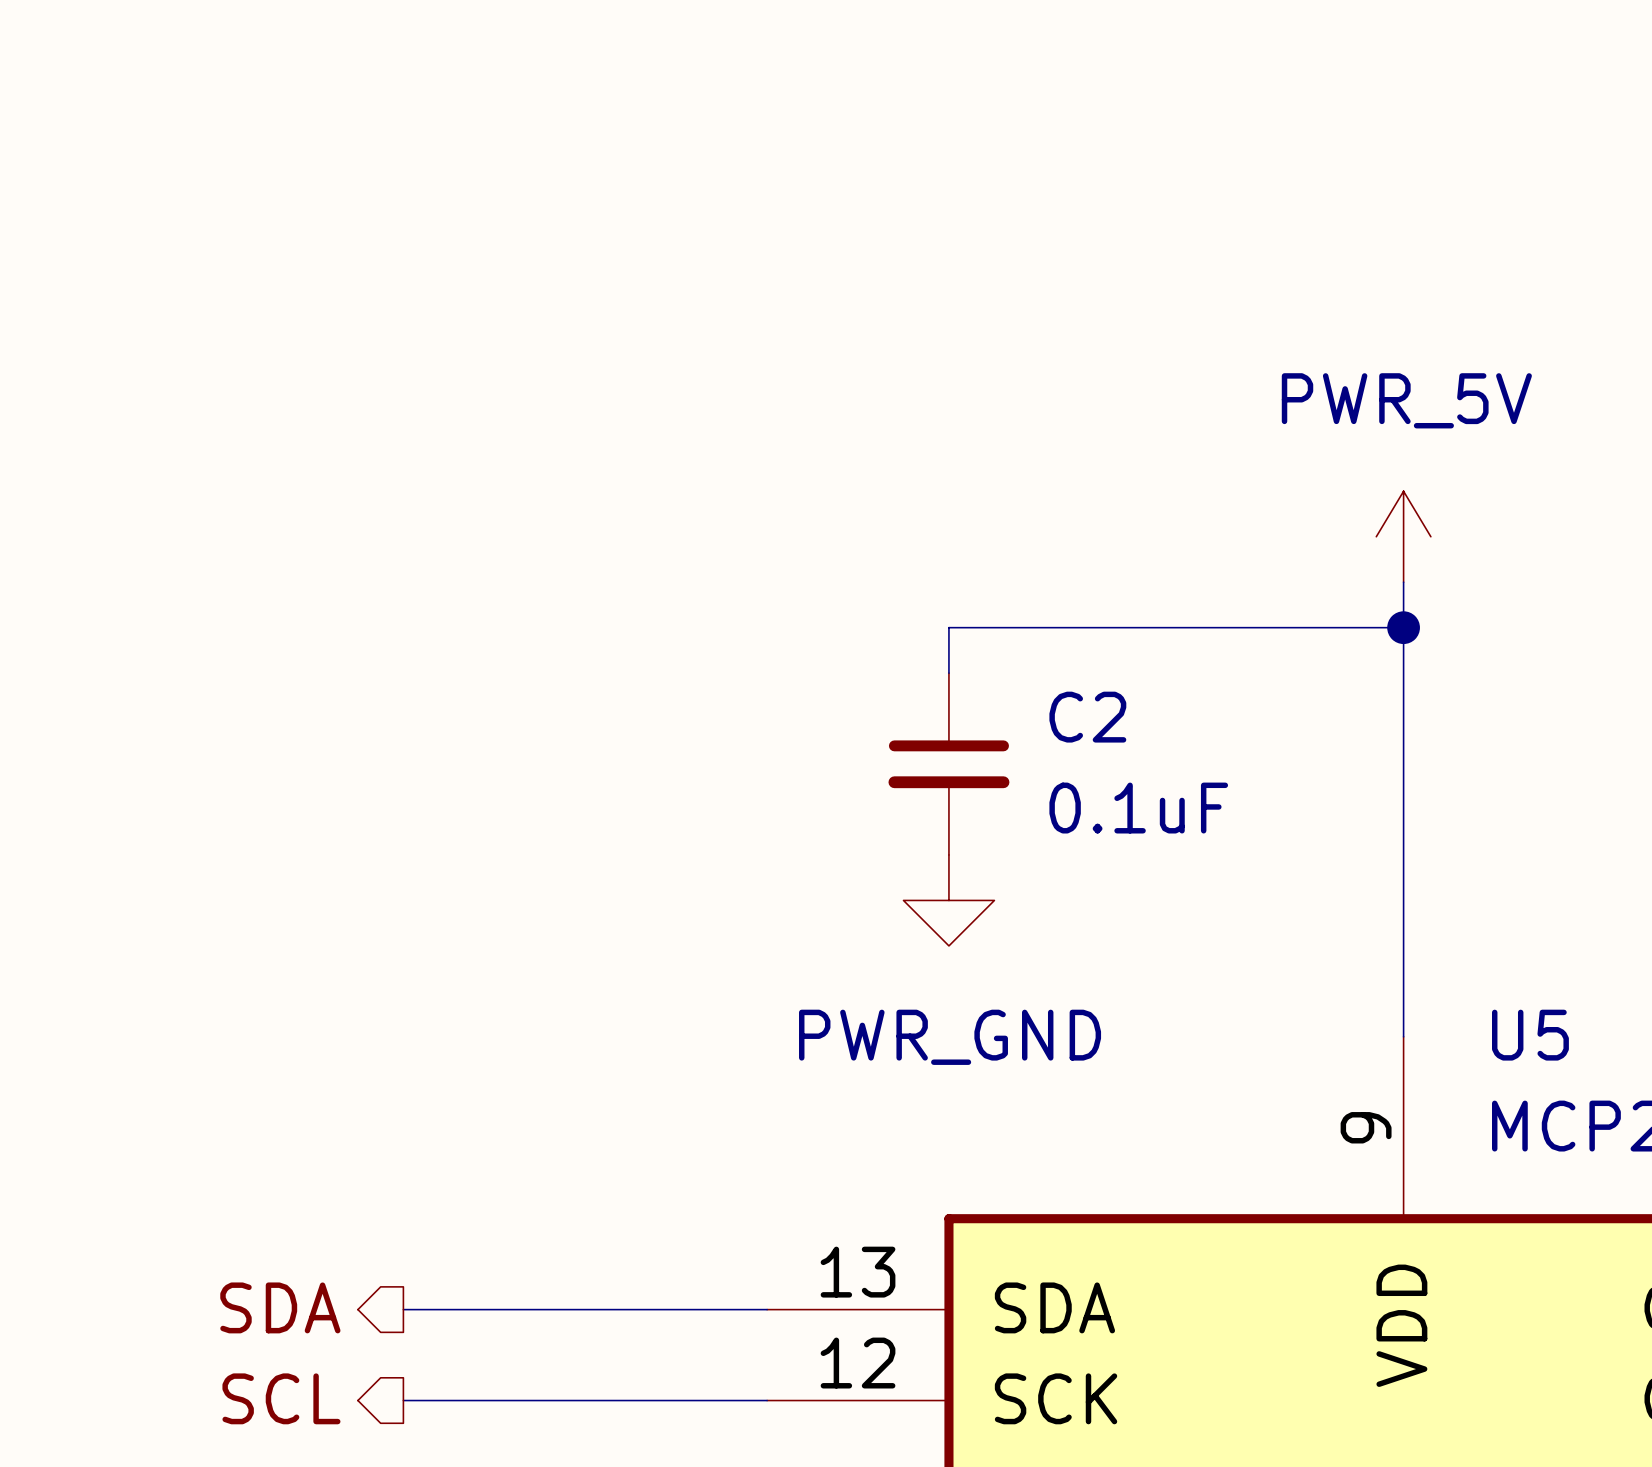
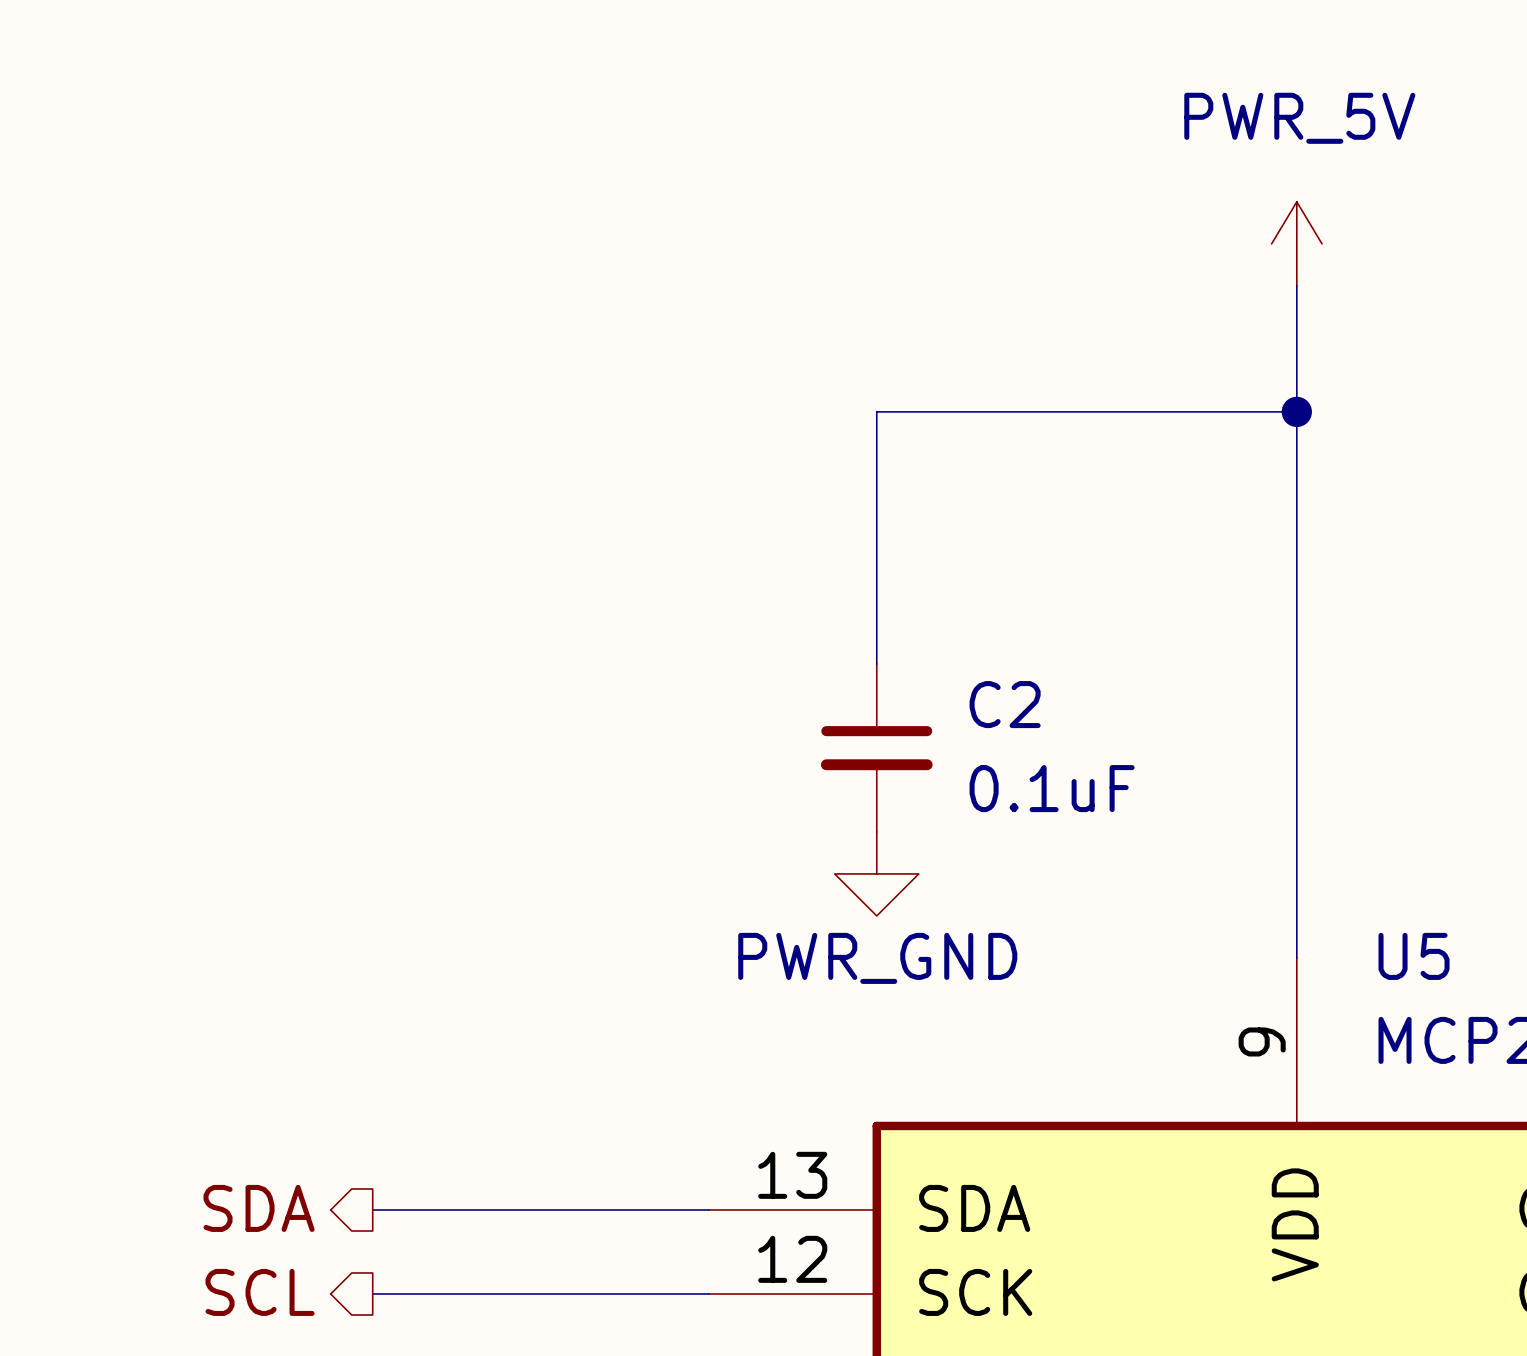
wire: none -> (1296, 285) (1296, 537)
power symbol position: PWR_5V (1403, 536) -> PWR_5V (1296, 243)
wire: (948, 627) (1403, 627) -> (876, 579) (876, 411) (1296, 411)
junction position: (1403, 627) -> (1296, 411)
C2 position: (948, 764) -> (876, 747)
power symbol position: PWR_GND (948, 900) -> PWR_GND (876, 873)

